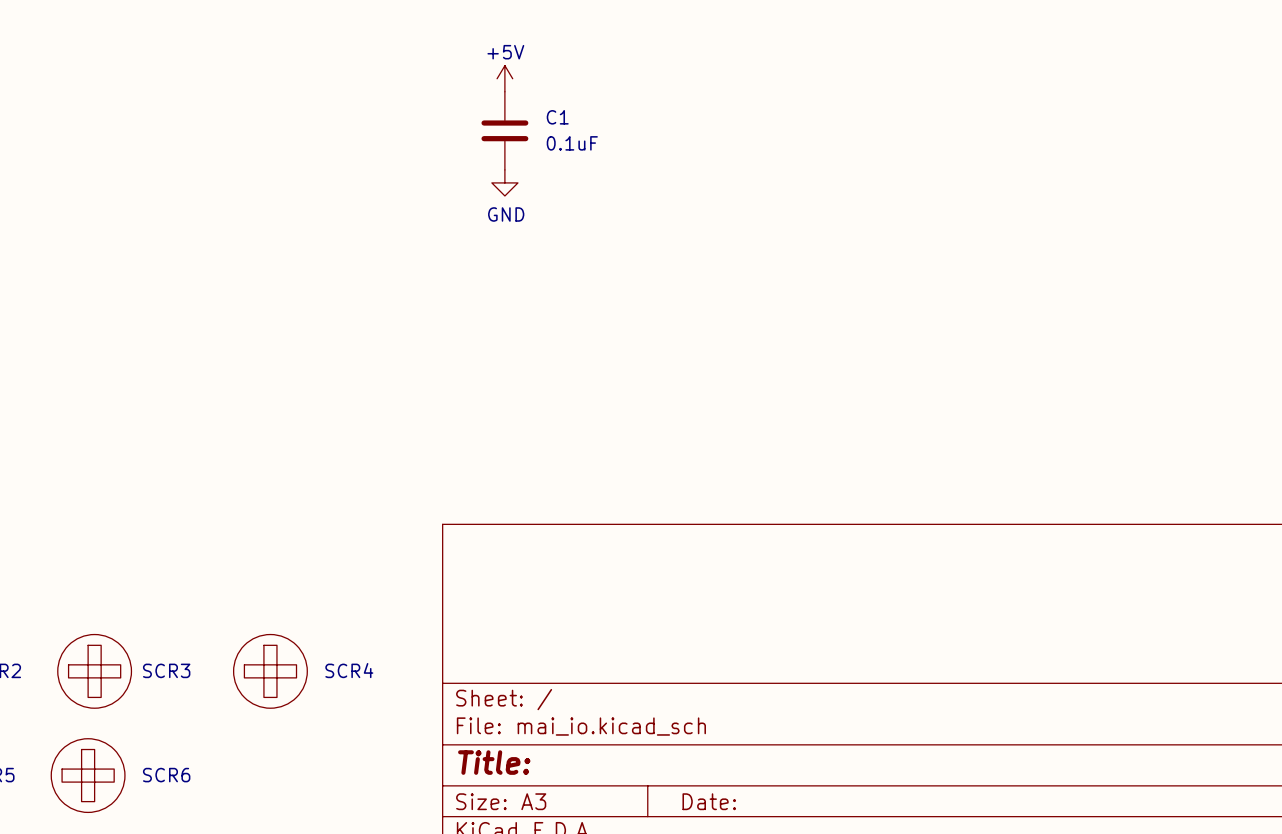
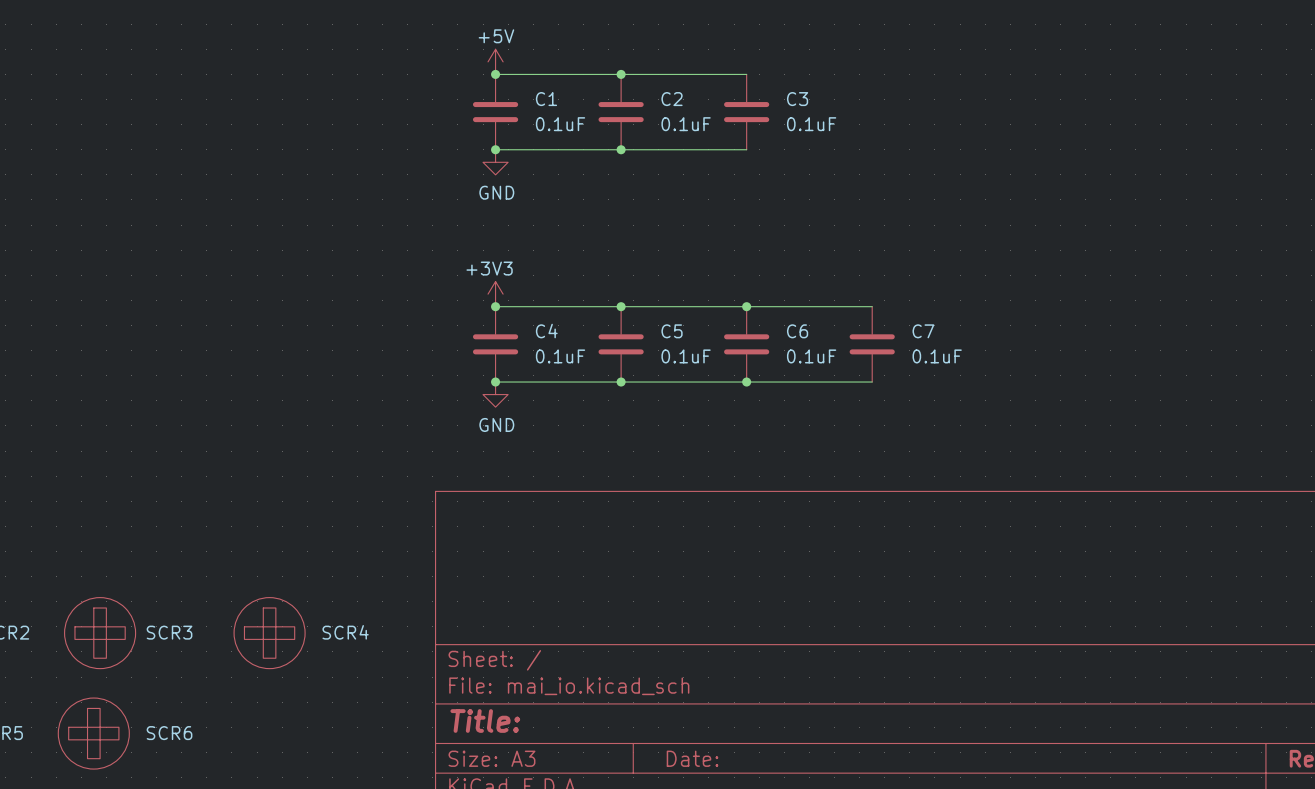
wire: none -> (495, 74) (746, 74)
junction: none -> (495, 74)
junction: none -> (621, 74)
C2: none -> 0.1uF (621, 112)
C3: none -> 0.1uF (746, 112)
wire: none -> (495, 149) (746, 149)
junction: none -> (495, 149)
junction: none -> (621, 149)
power symbol: none -> +3V3 (495, 294)
wire: none -> (495, 306) (872, 306)
junction: none -> (495, 306)
junction: none -> (621, 306)
junction: none -> (746, 306)
C4: none -> 0.1uF (495, 344)
C5: none -> 0.1uF (621, 344)
C6: none -> 0.1uF (746, 344)
C7: none -> 0.1uF (872, 344)
wire: none -> (495, 382) (872, 382)
junction: none -> (495, 382)
junction: none -> (621, 382)
junction: none -> (746, 382)
power symbol: none -> GND (495, 394)

